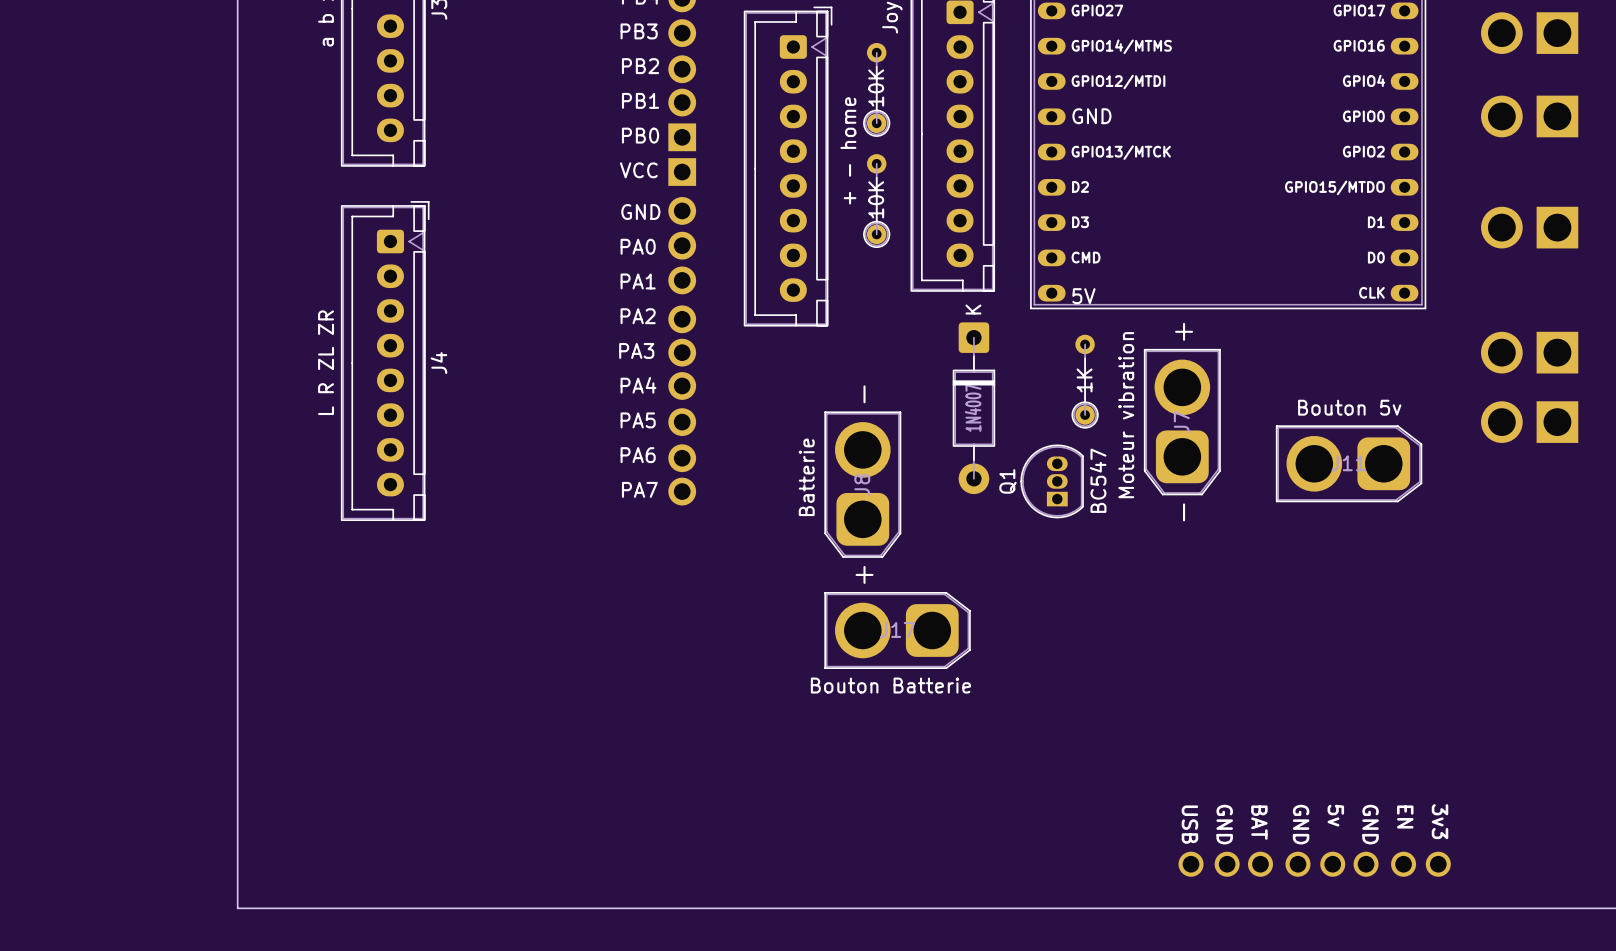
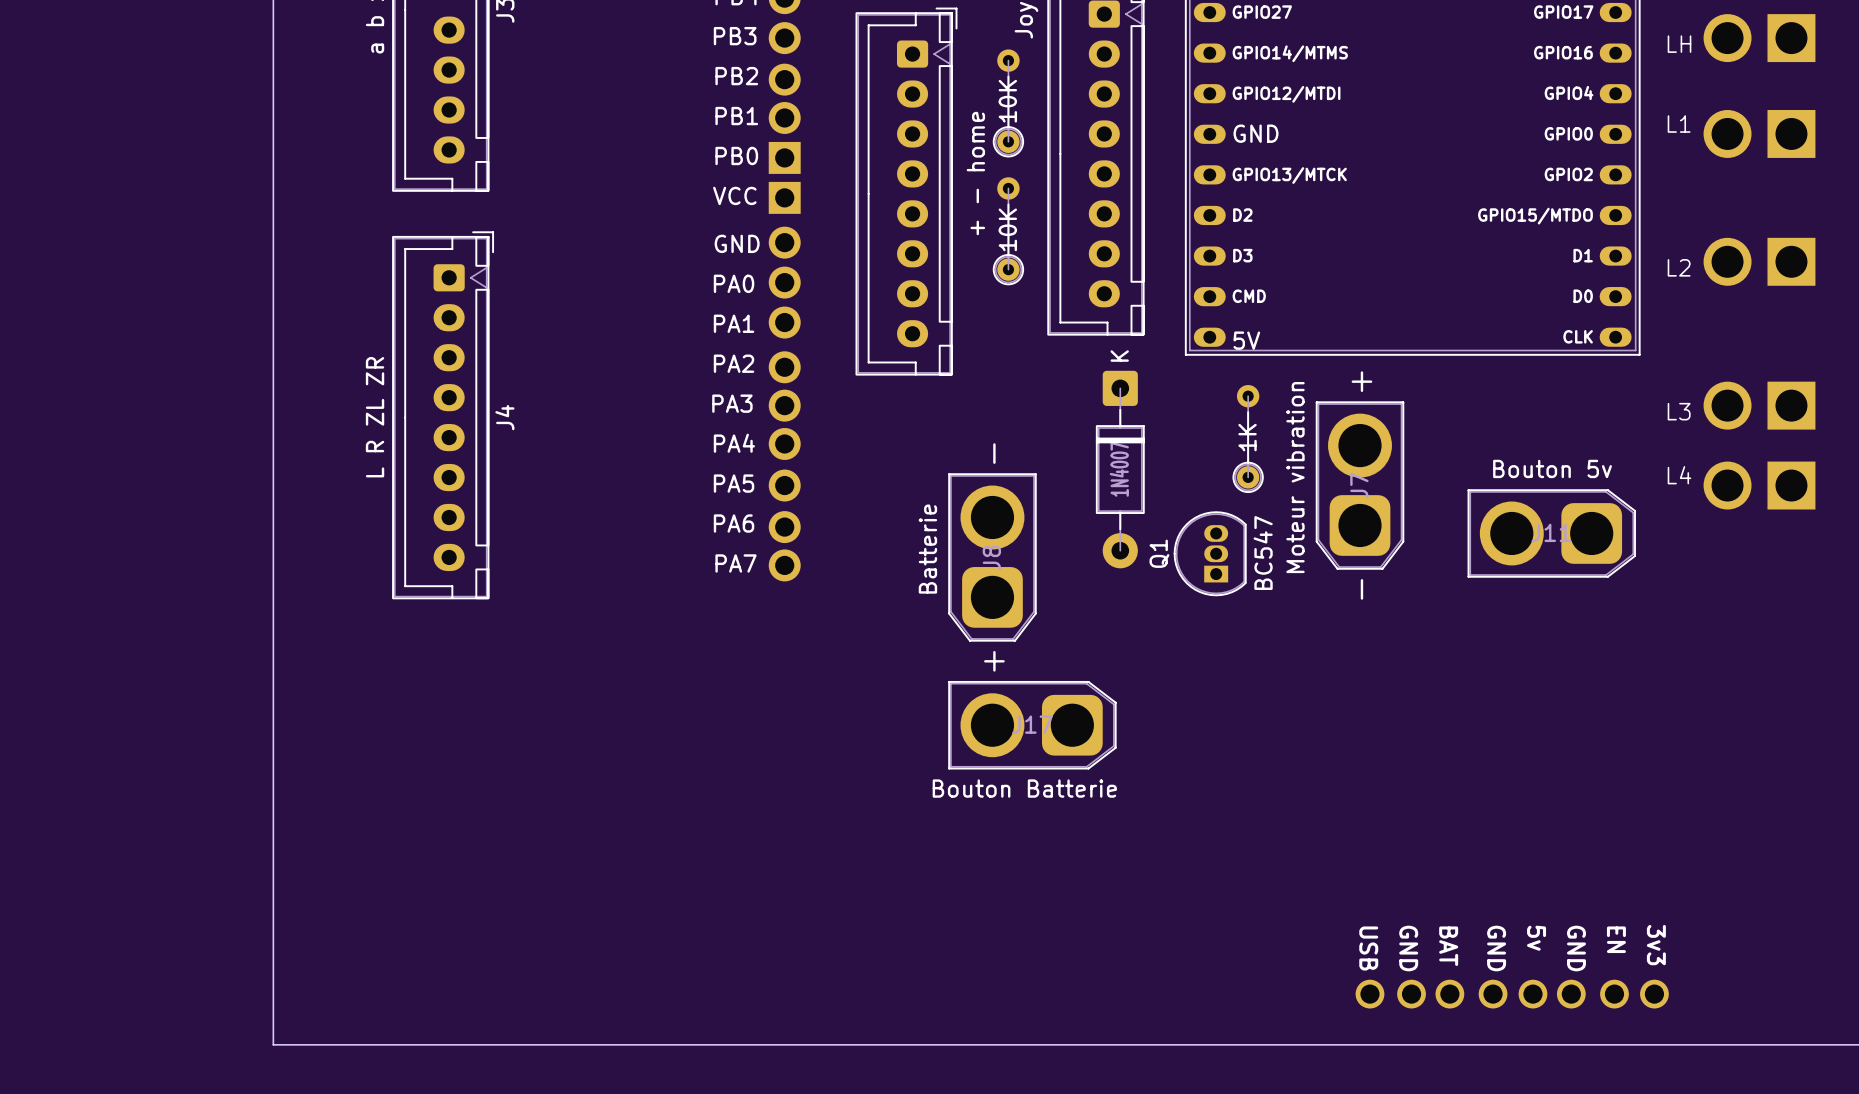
text: none -> LH (1679, 44)
text: none -> L1 (1679, 124)
text: none -> L2 (1679, 267)
text: none -> L3 (1679, 411)
text: none -> L4 (1679, 475)

